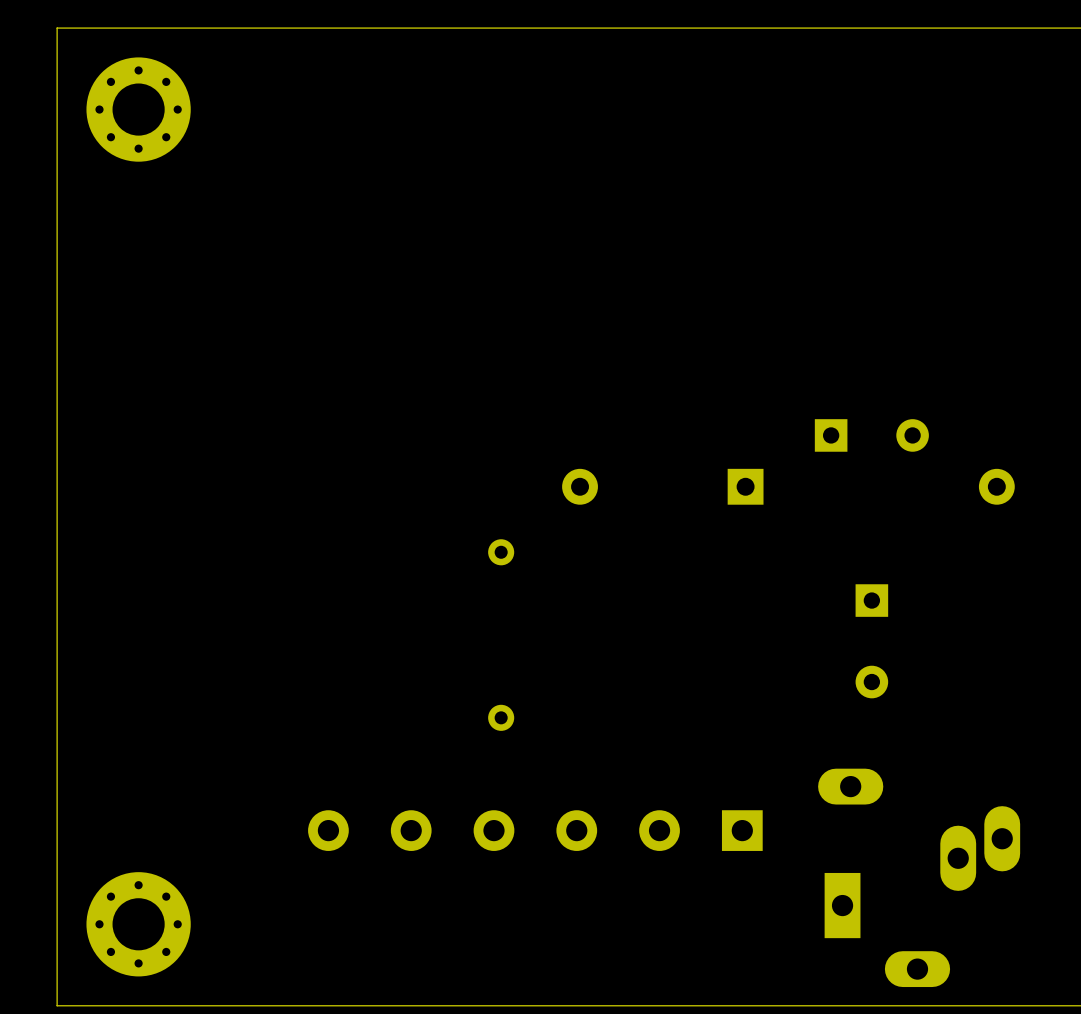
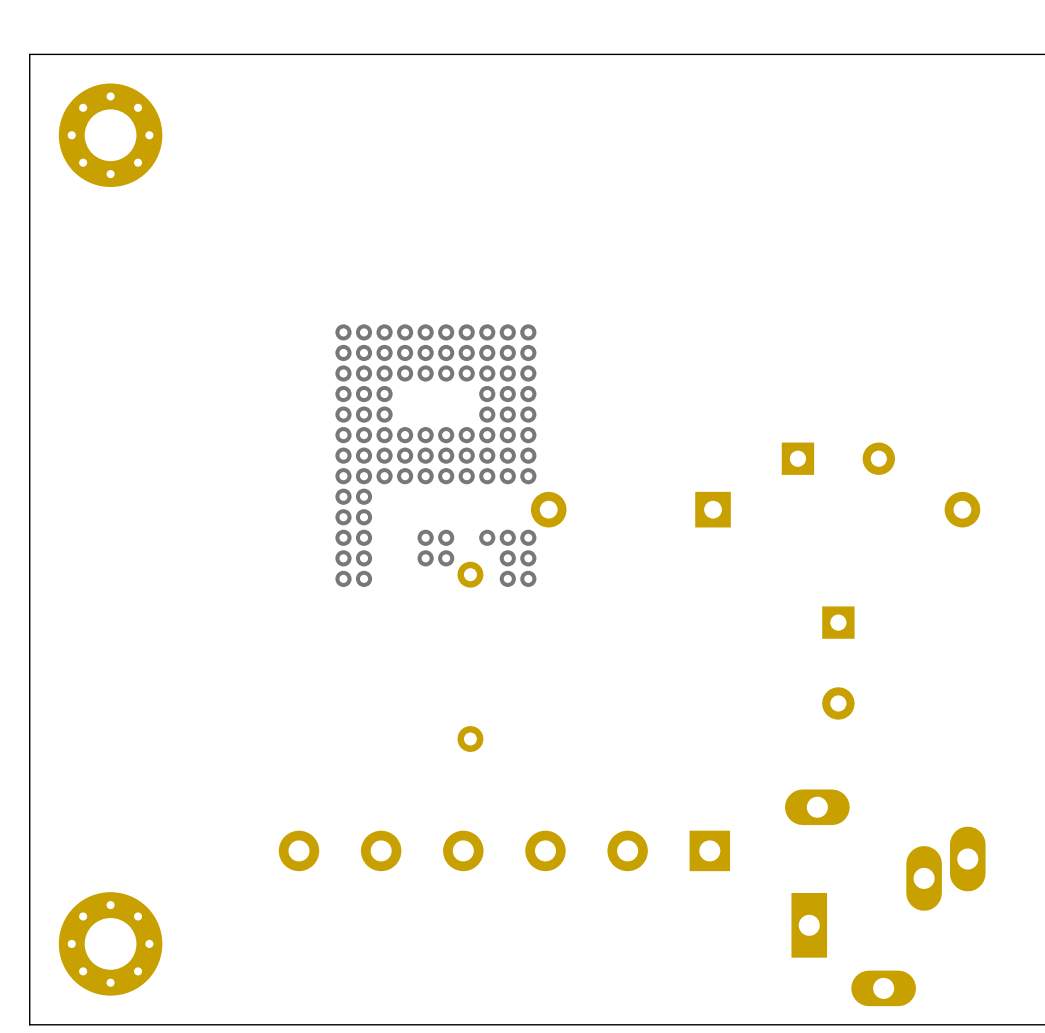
via: none -> (343, 332)
via: none -> (364, 332)
via: none -> (384, 332)
via: none -> (405, 332)
via: none -> (425, 332)
via: none -> (446, 332)
via: none -> (466, 332)
via: none -> (487, 332)
via: none -> (507, 332)
via: none -> (528, 332)
via: none -> (343, 352)
via: none -> (364, 352)
via: none -> (384, 352)
via: none -> (405, 352)
via: none -> (425, 352)
via: none -> (446, 352)
via: none -> (466, 352)
via: none -> (487, 352)
via: none -> (507, 352)
via: none -> (528, 352)
via: none -> (343, 373)
via: none -> (364, 373)
via: none -> (384, 373)
via: none -> (405, 373)
via: none -> (425, 373)
via: none -> (446, 373)
via: none -> (466, 373)
via: none -> (487, 373)
via: none -> (507, 373)
via: none -> (528, 373)
via: none -> (343, 394)
via: none -> (364, 394)
via: none -> (384, 394)
via: none -> (487, 394)
via: none -> (507, 394)
via: none -> (528, 394)
via: none -> (343, 414)
via: none -> (364, 414)
via: none -> (384, 414)
via: none -> (487, 414)
via: none -> (507, 414)
via: none -> (528, 414)
via: none -> (343, 435)
via: none -> (364, 435)
via: none -> (384, 435)
via: none -> (405, 435)
via: none -> (425, 435)
via: none -> (446, 435)
via: none -> (466, 435)
via: none -> (487, 435)
via: none -> (507, 435)
via: none -> (528, 435)
via: none -> (343, 455)
via: none -> (364, 455)
via: none -> (384, 455)
via: none -> (405, 455)
via: none -> (425, 455)
via: none -> (446, 455)
via: none -> (466, 455)
via: none -> (487, 455)
via: none -> (507, 455)
via: none -> (528, 455)
via: none -> (343, 476)
via: none -> (364, 476)
via: none -> (384, 476)
via: none -> (405, 476)
via: none -> (425, 476)
via: none -> (446, 476)
via: none -> (466, 476)
via: none -> (487, 476)
via: none -> (507, 476)
via: none -> (528, 476)
via: none -> (343, 496)
via: none -> (364, 496)
via: none -> (343, 517)
via: none -> (364, 517)
via: none -> (343, 537)
via: none -> (364, 537)
via: none -> (425, 537)
via: none -> (446, 537)
via: none -> (487, 537)
via: none -> (507, 537)
via: none -> (528, 537)
via: none -> (343, 558)
via: none -> (364, 558)
via: none -> (425, 558)
via: none -> (446, 558)
via: none -> (507, 558)
via: none -> (528, 558)
via: none -> (343, 578)
via: none -> (364, 578)
via: none -> (507, 578)
via: none -> (528, 578)

